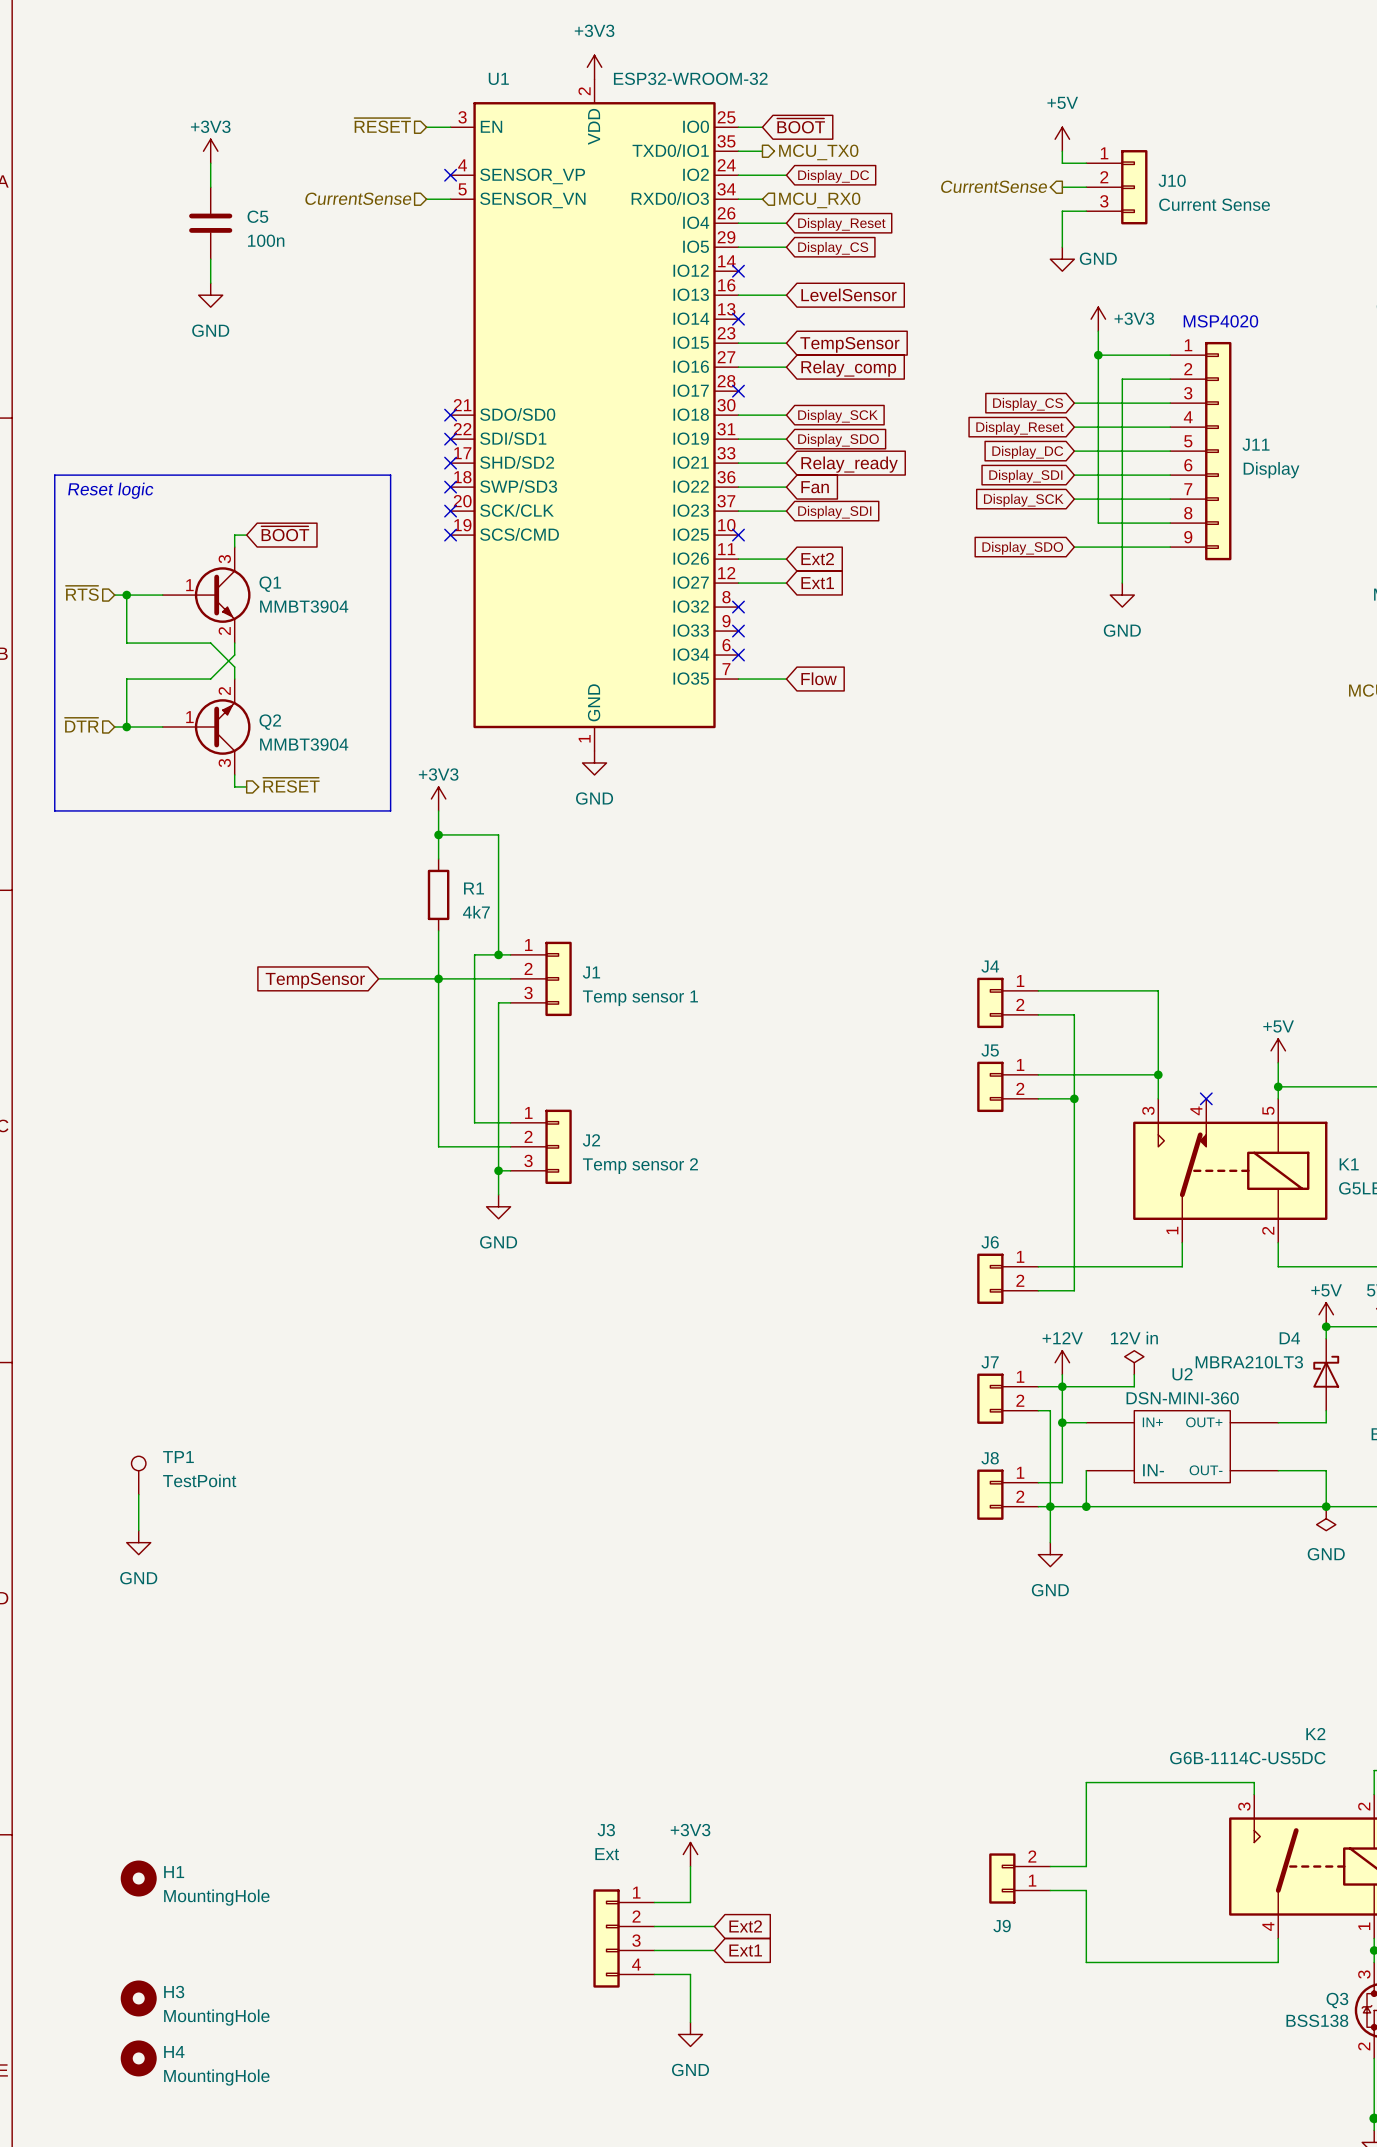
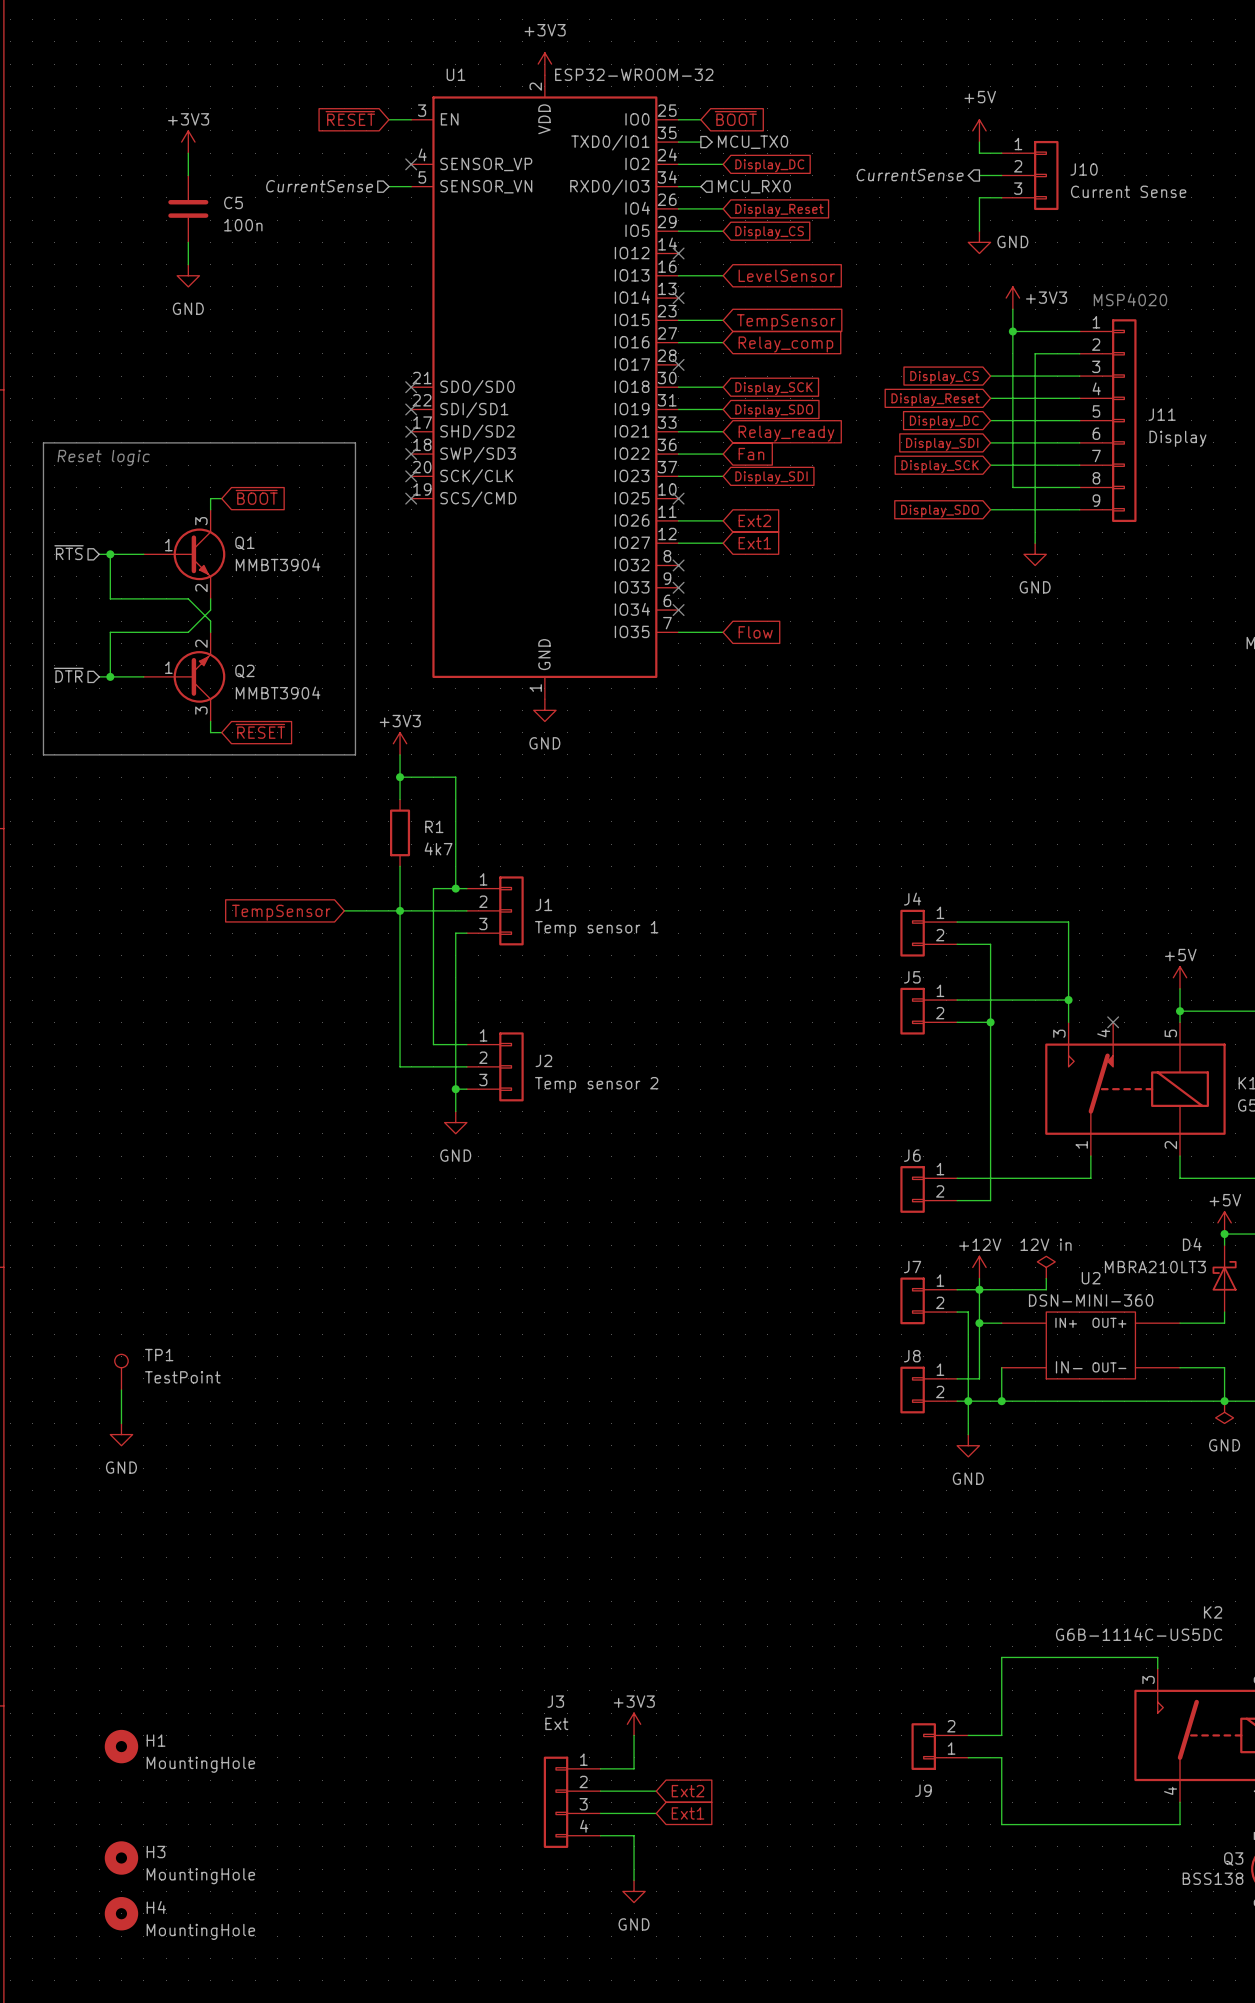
hierarchical label: ~{RESET} (382, 125) -> none
global label: none -> ~{RESET} (350, 118)
global label: none -> ~{RESET} (260, 731)
hierarchical label: ~{RESET} (291, 785) -> none

